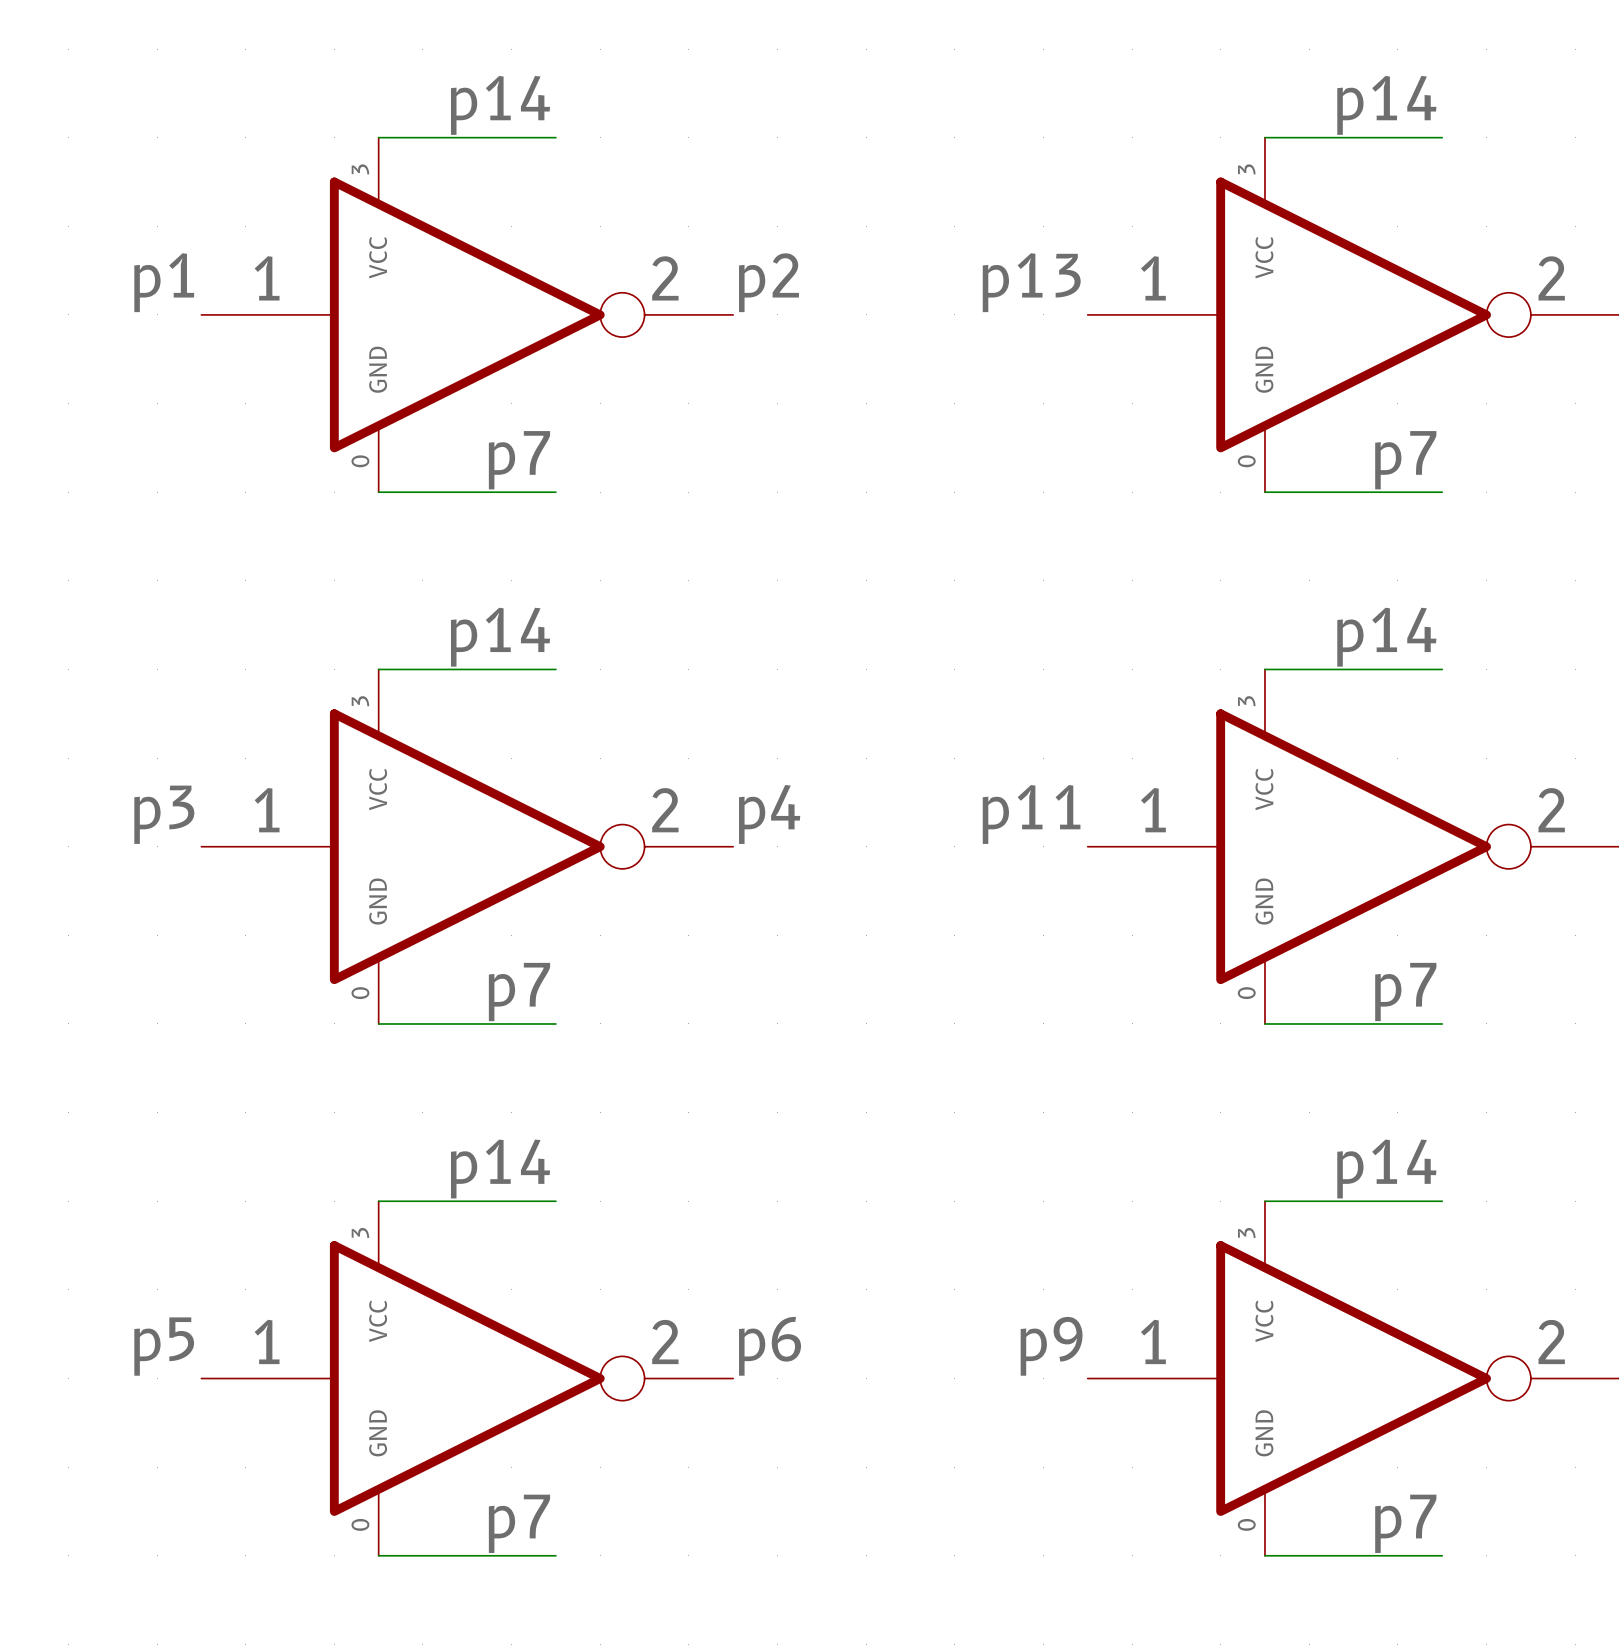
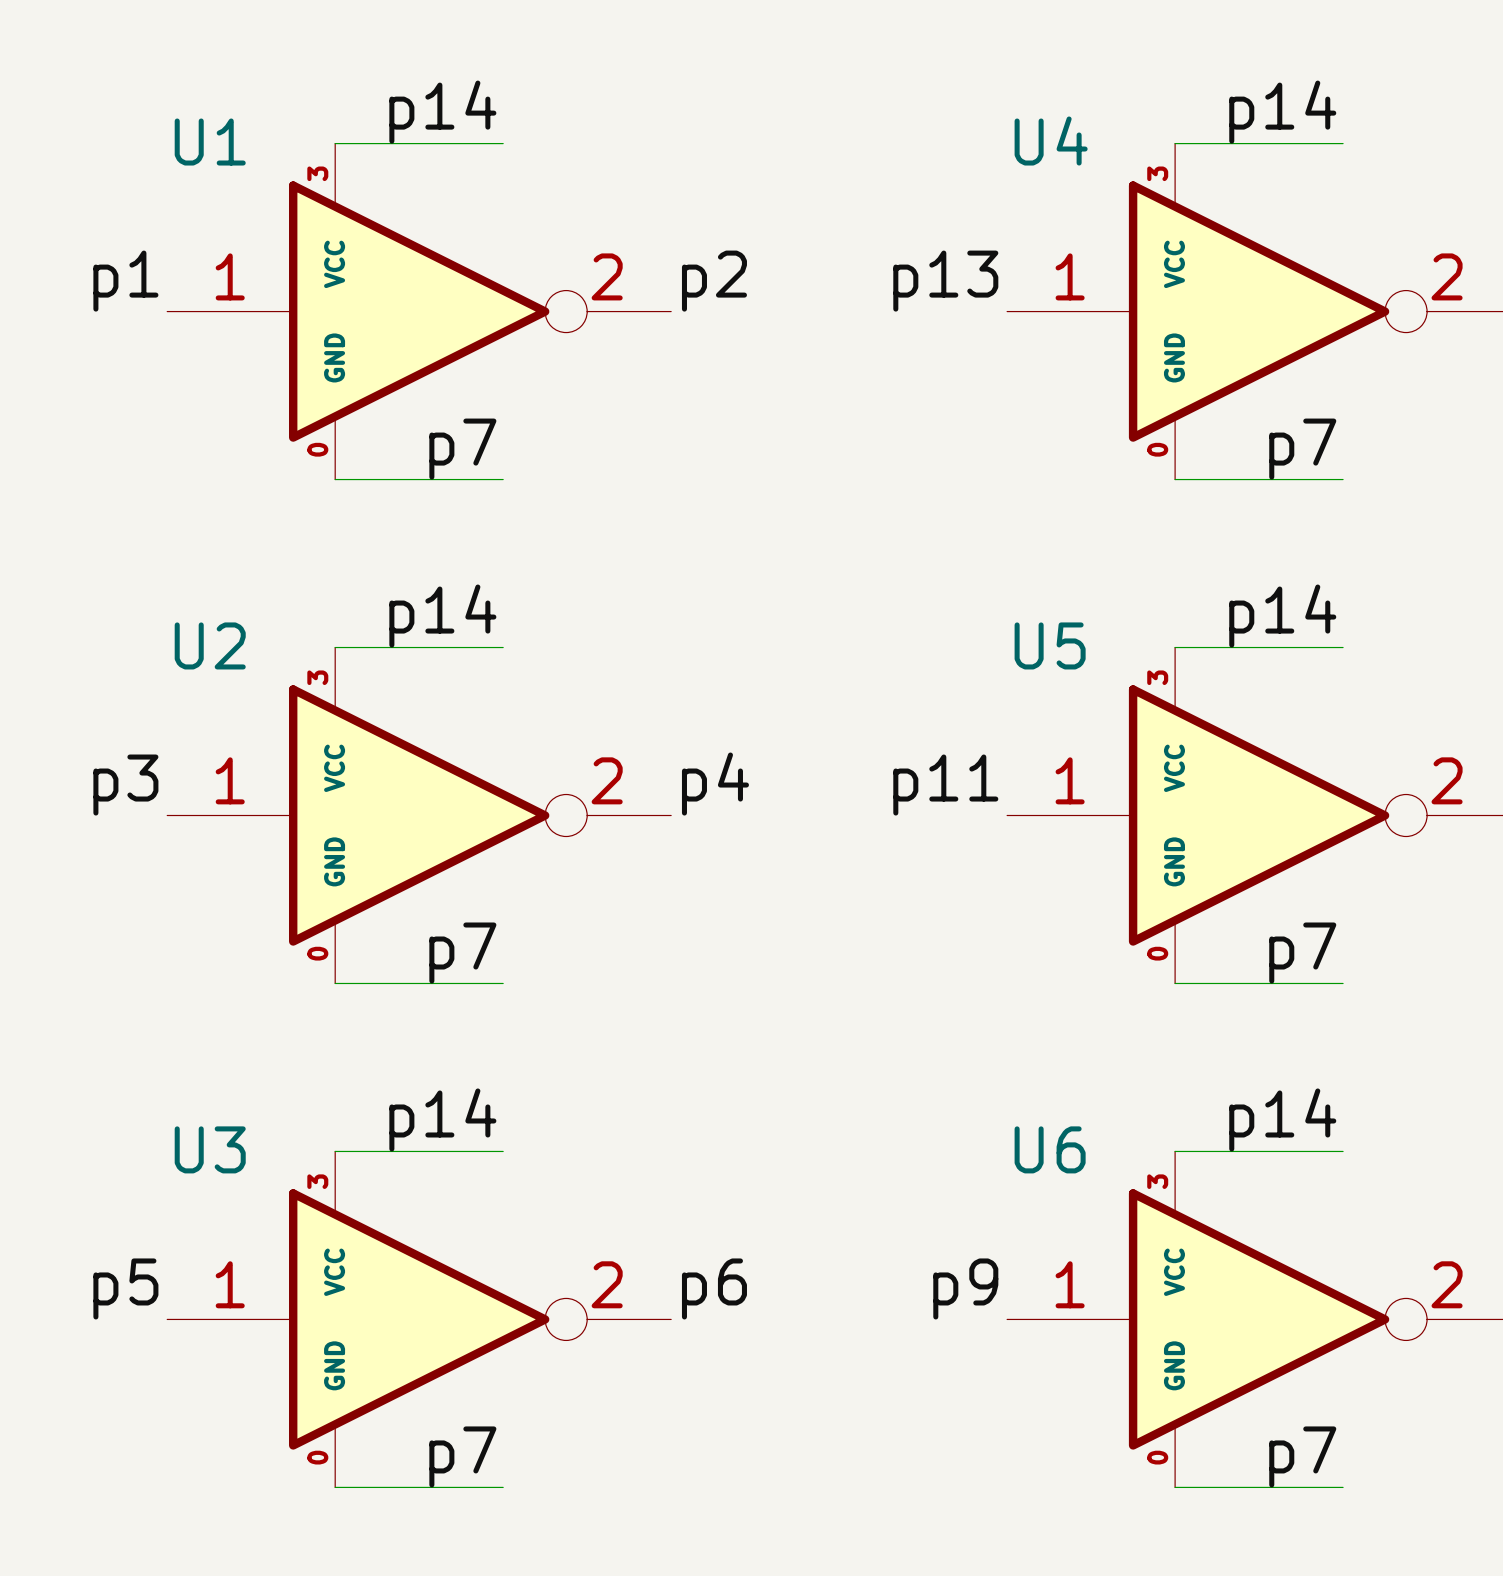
U1 name: none -> U1 (210, 142)
U4 name: none -> U4 (1051, 141)
U2 name: none -> U2 (210, 645)
U5 name: none -> U5 (1050, 645)
U3 name: none -> U3 (210, 1149)
U6 name: none -> U6 (1050, 1149)

